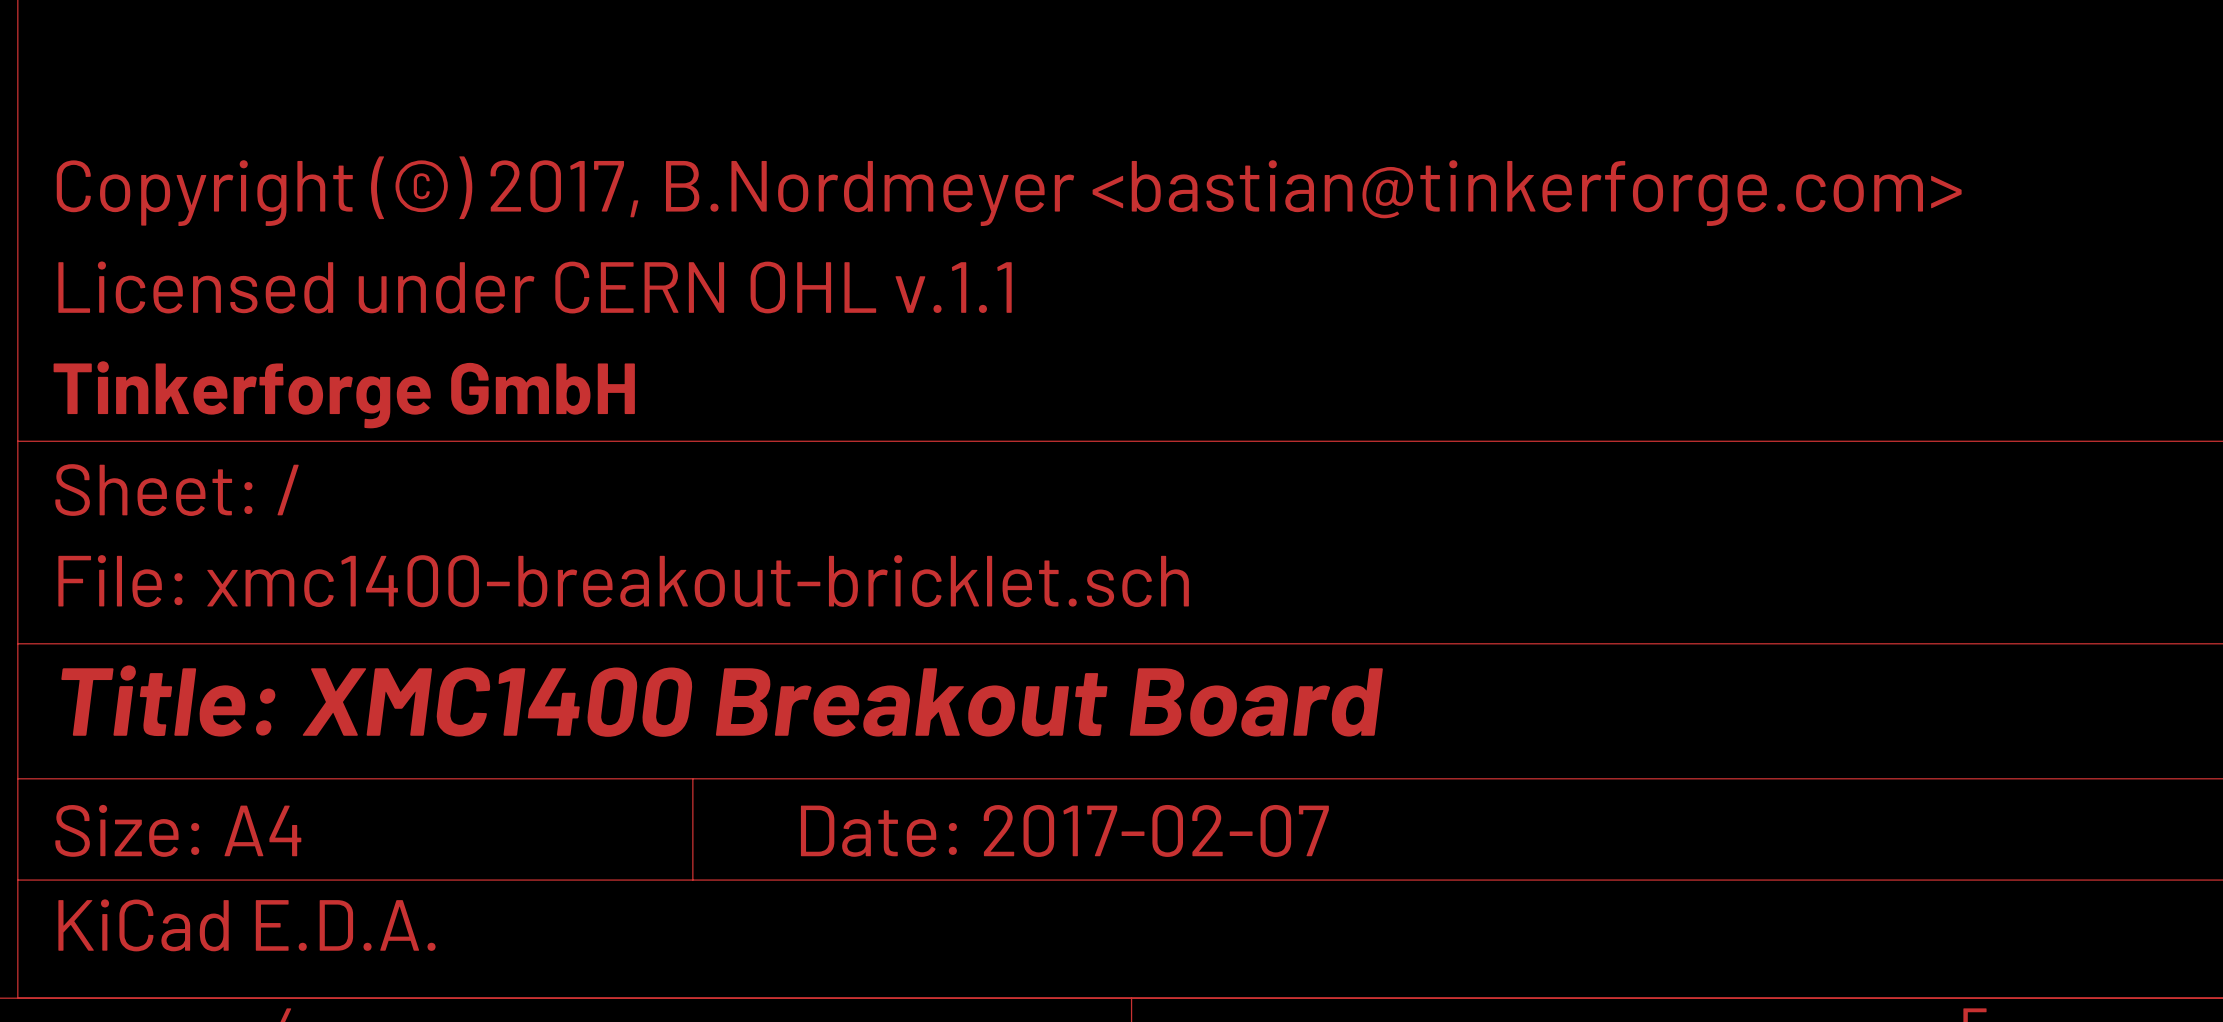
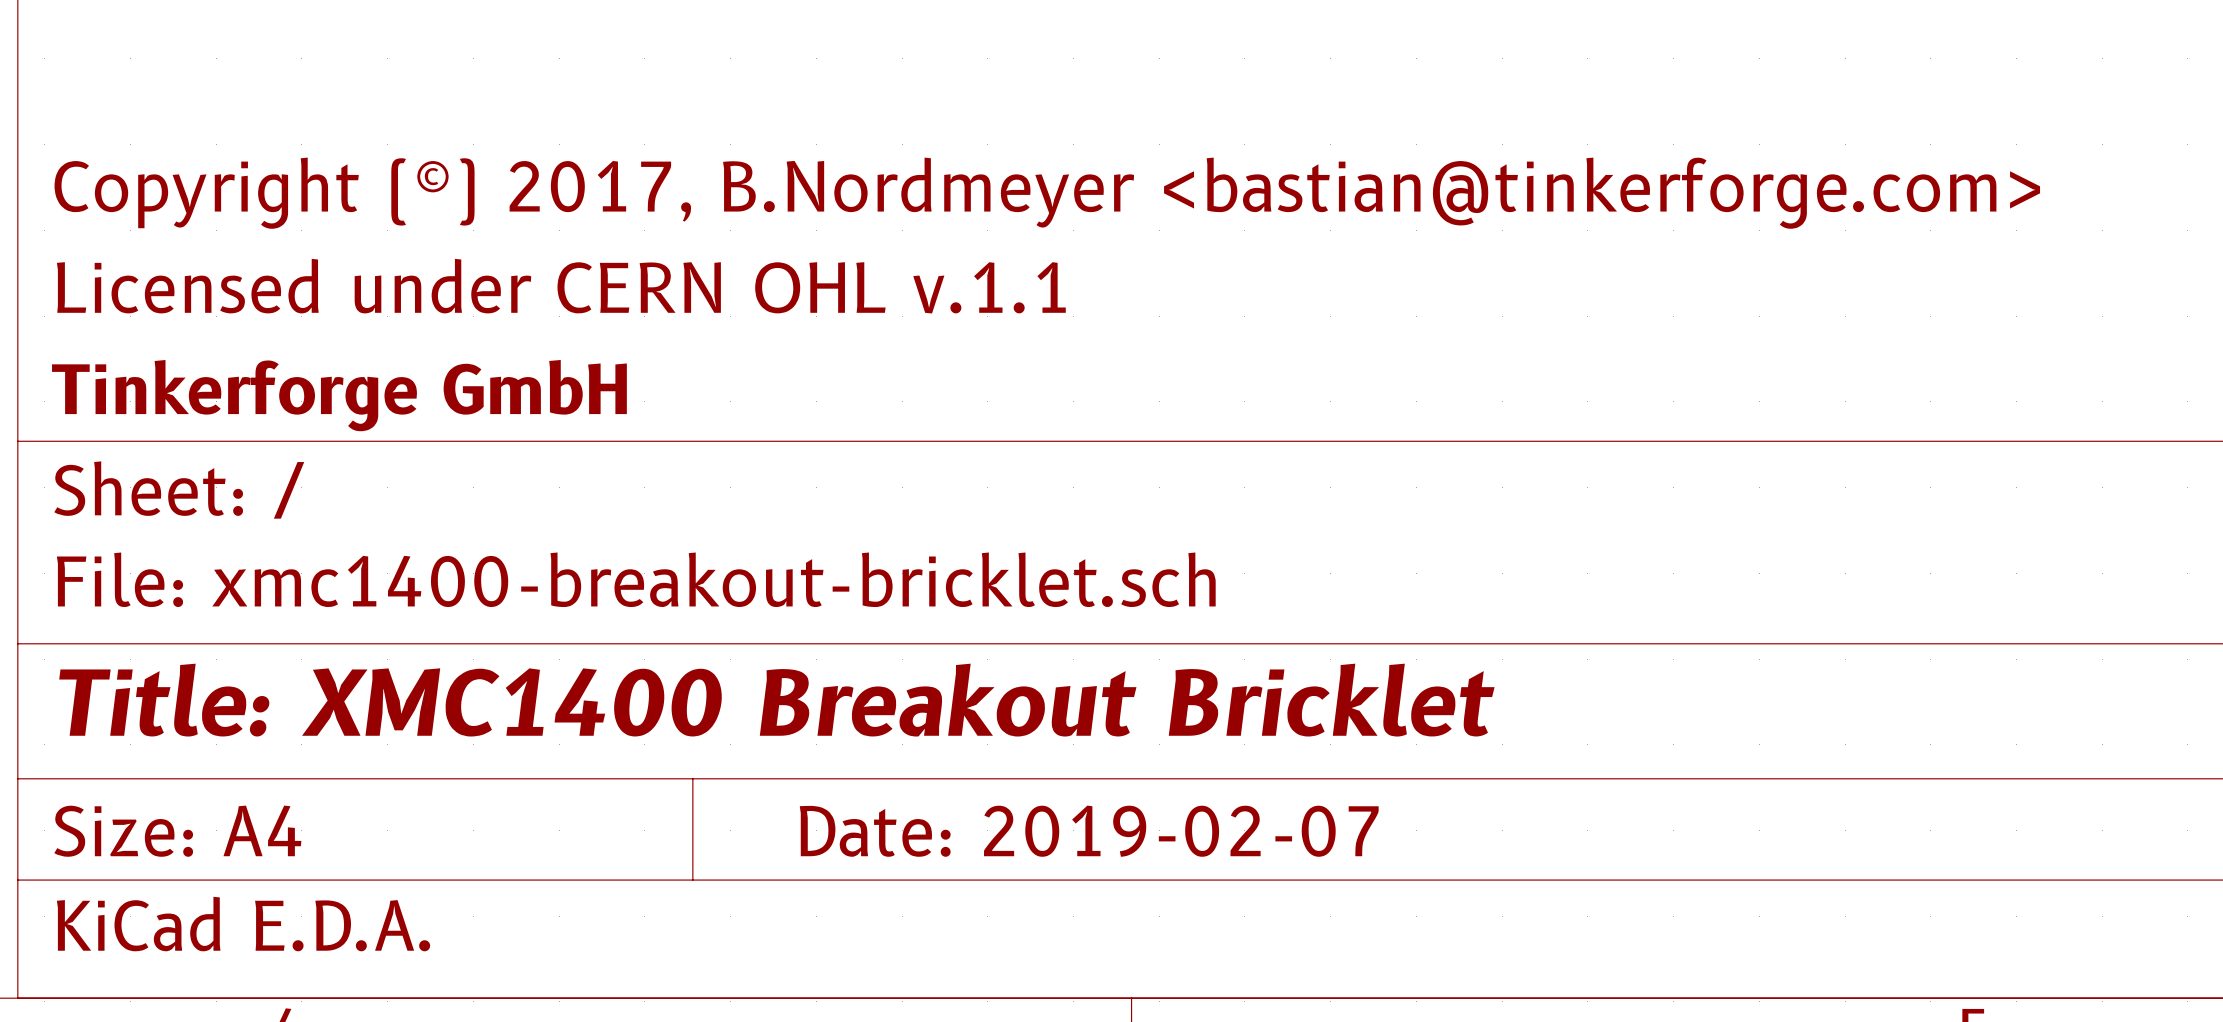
title block: Title: XMC1400 Breakout Board (722, 701) -> Title: XMC1400 Breakout Bricklet (776, 700)
title block: Date: 2017-02-07 (1064, 830) -> Date: 2019-02-07 (1089, 831)

